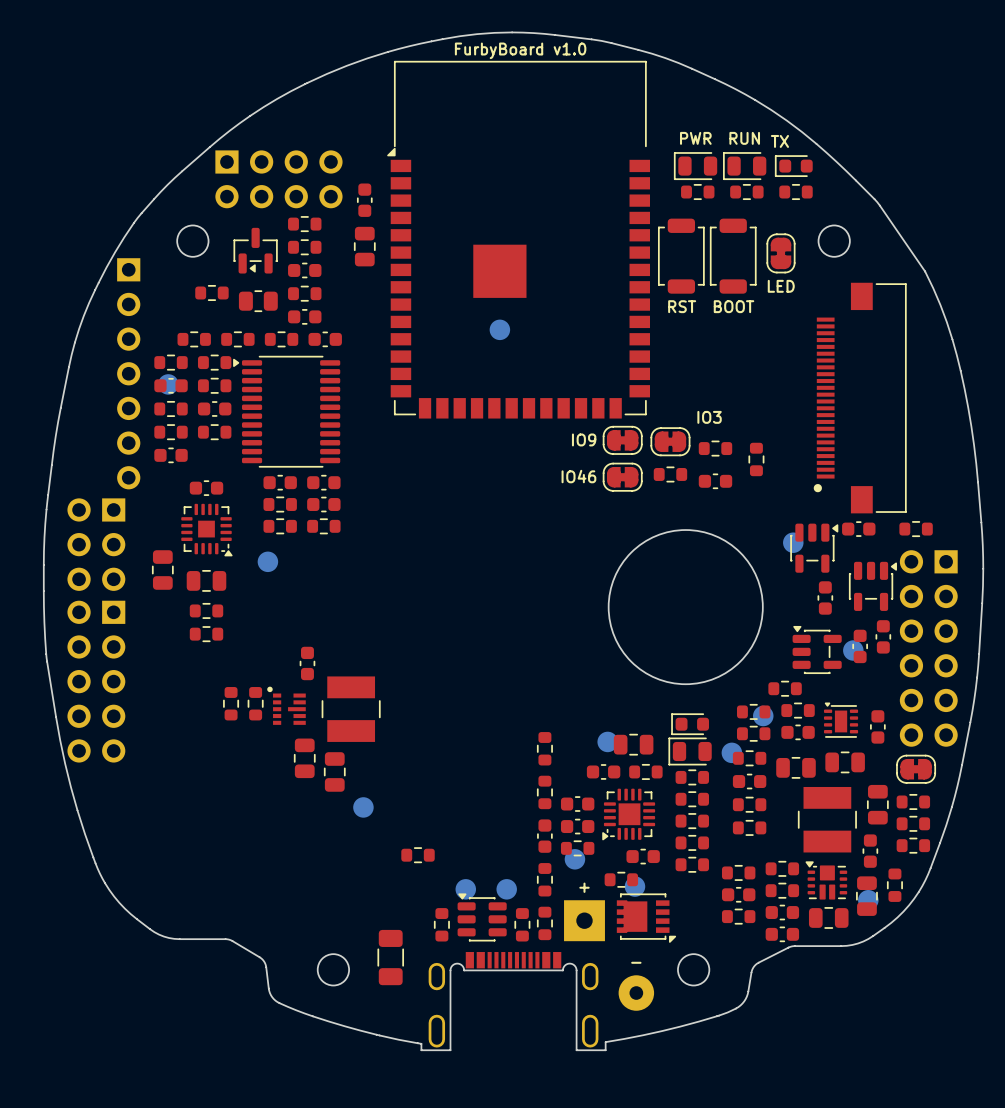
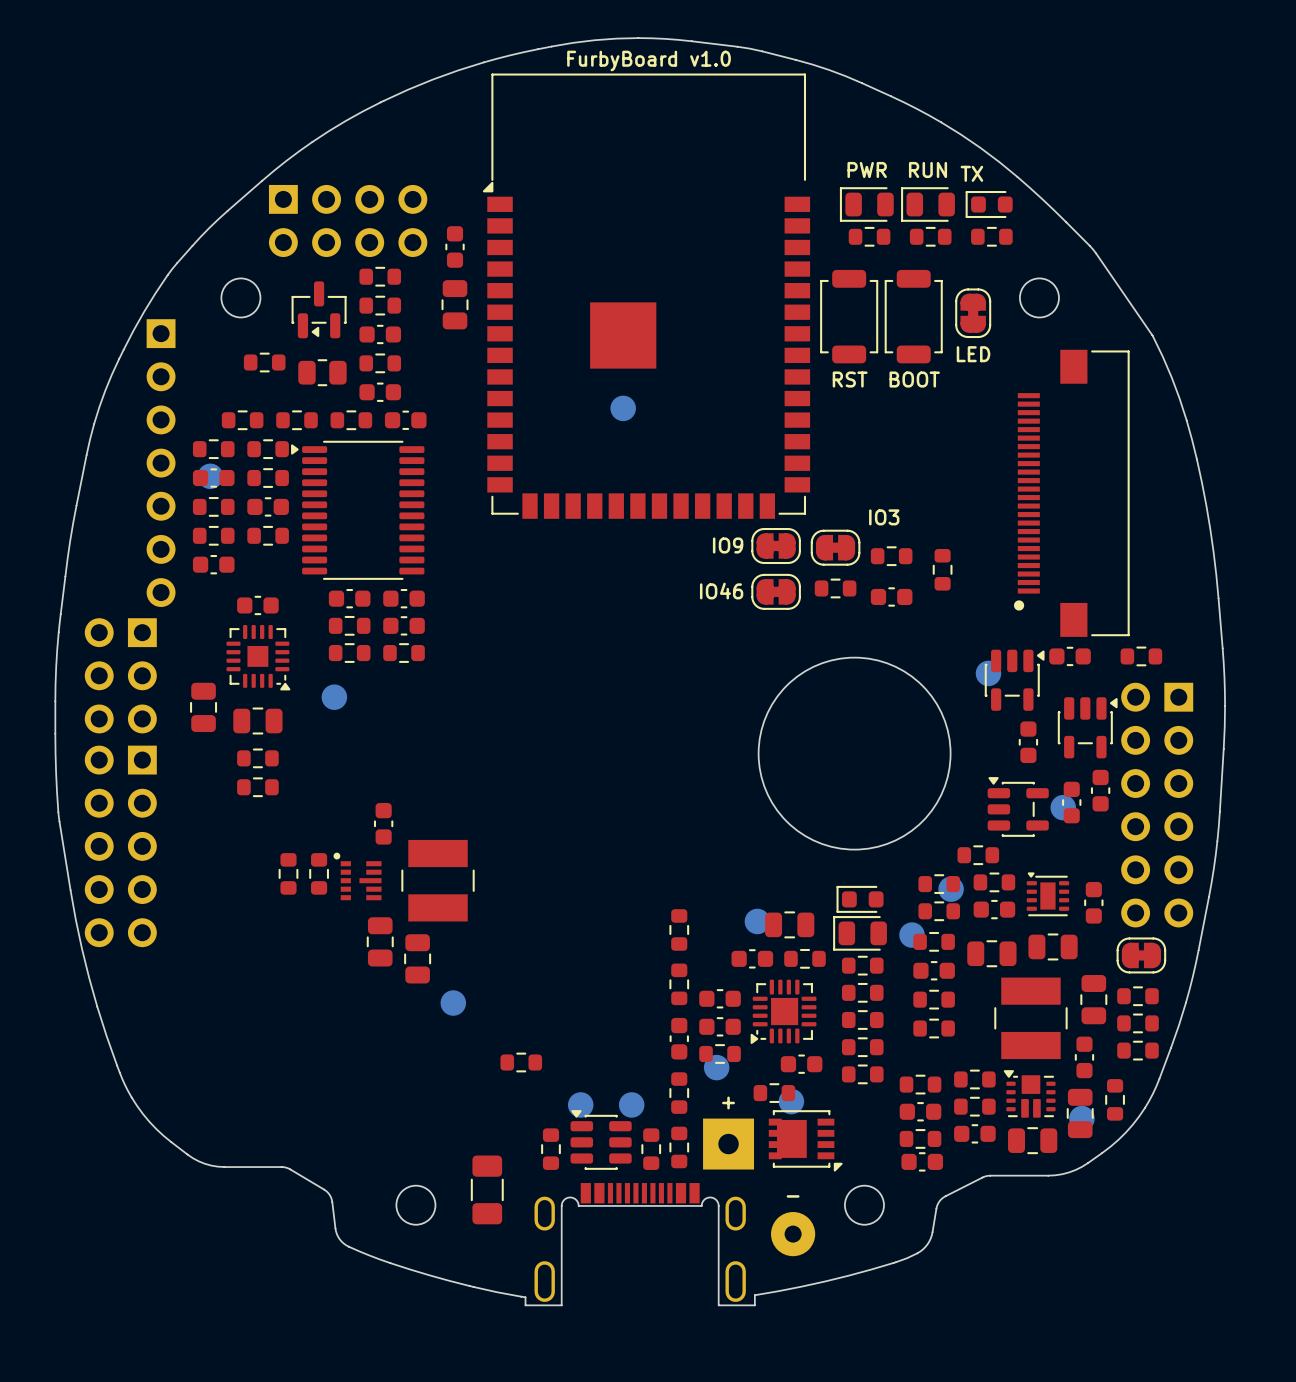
part position: (782, 934) -> (922, 1161)

